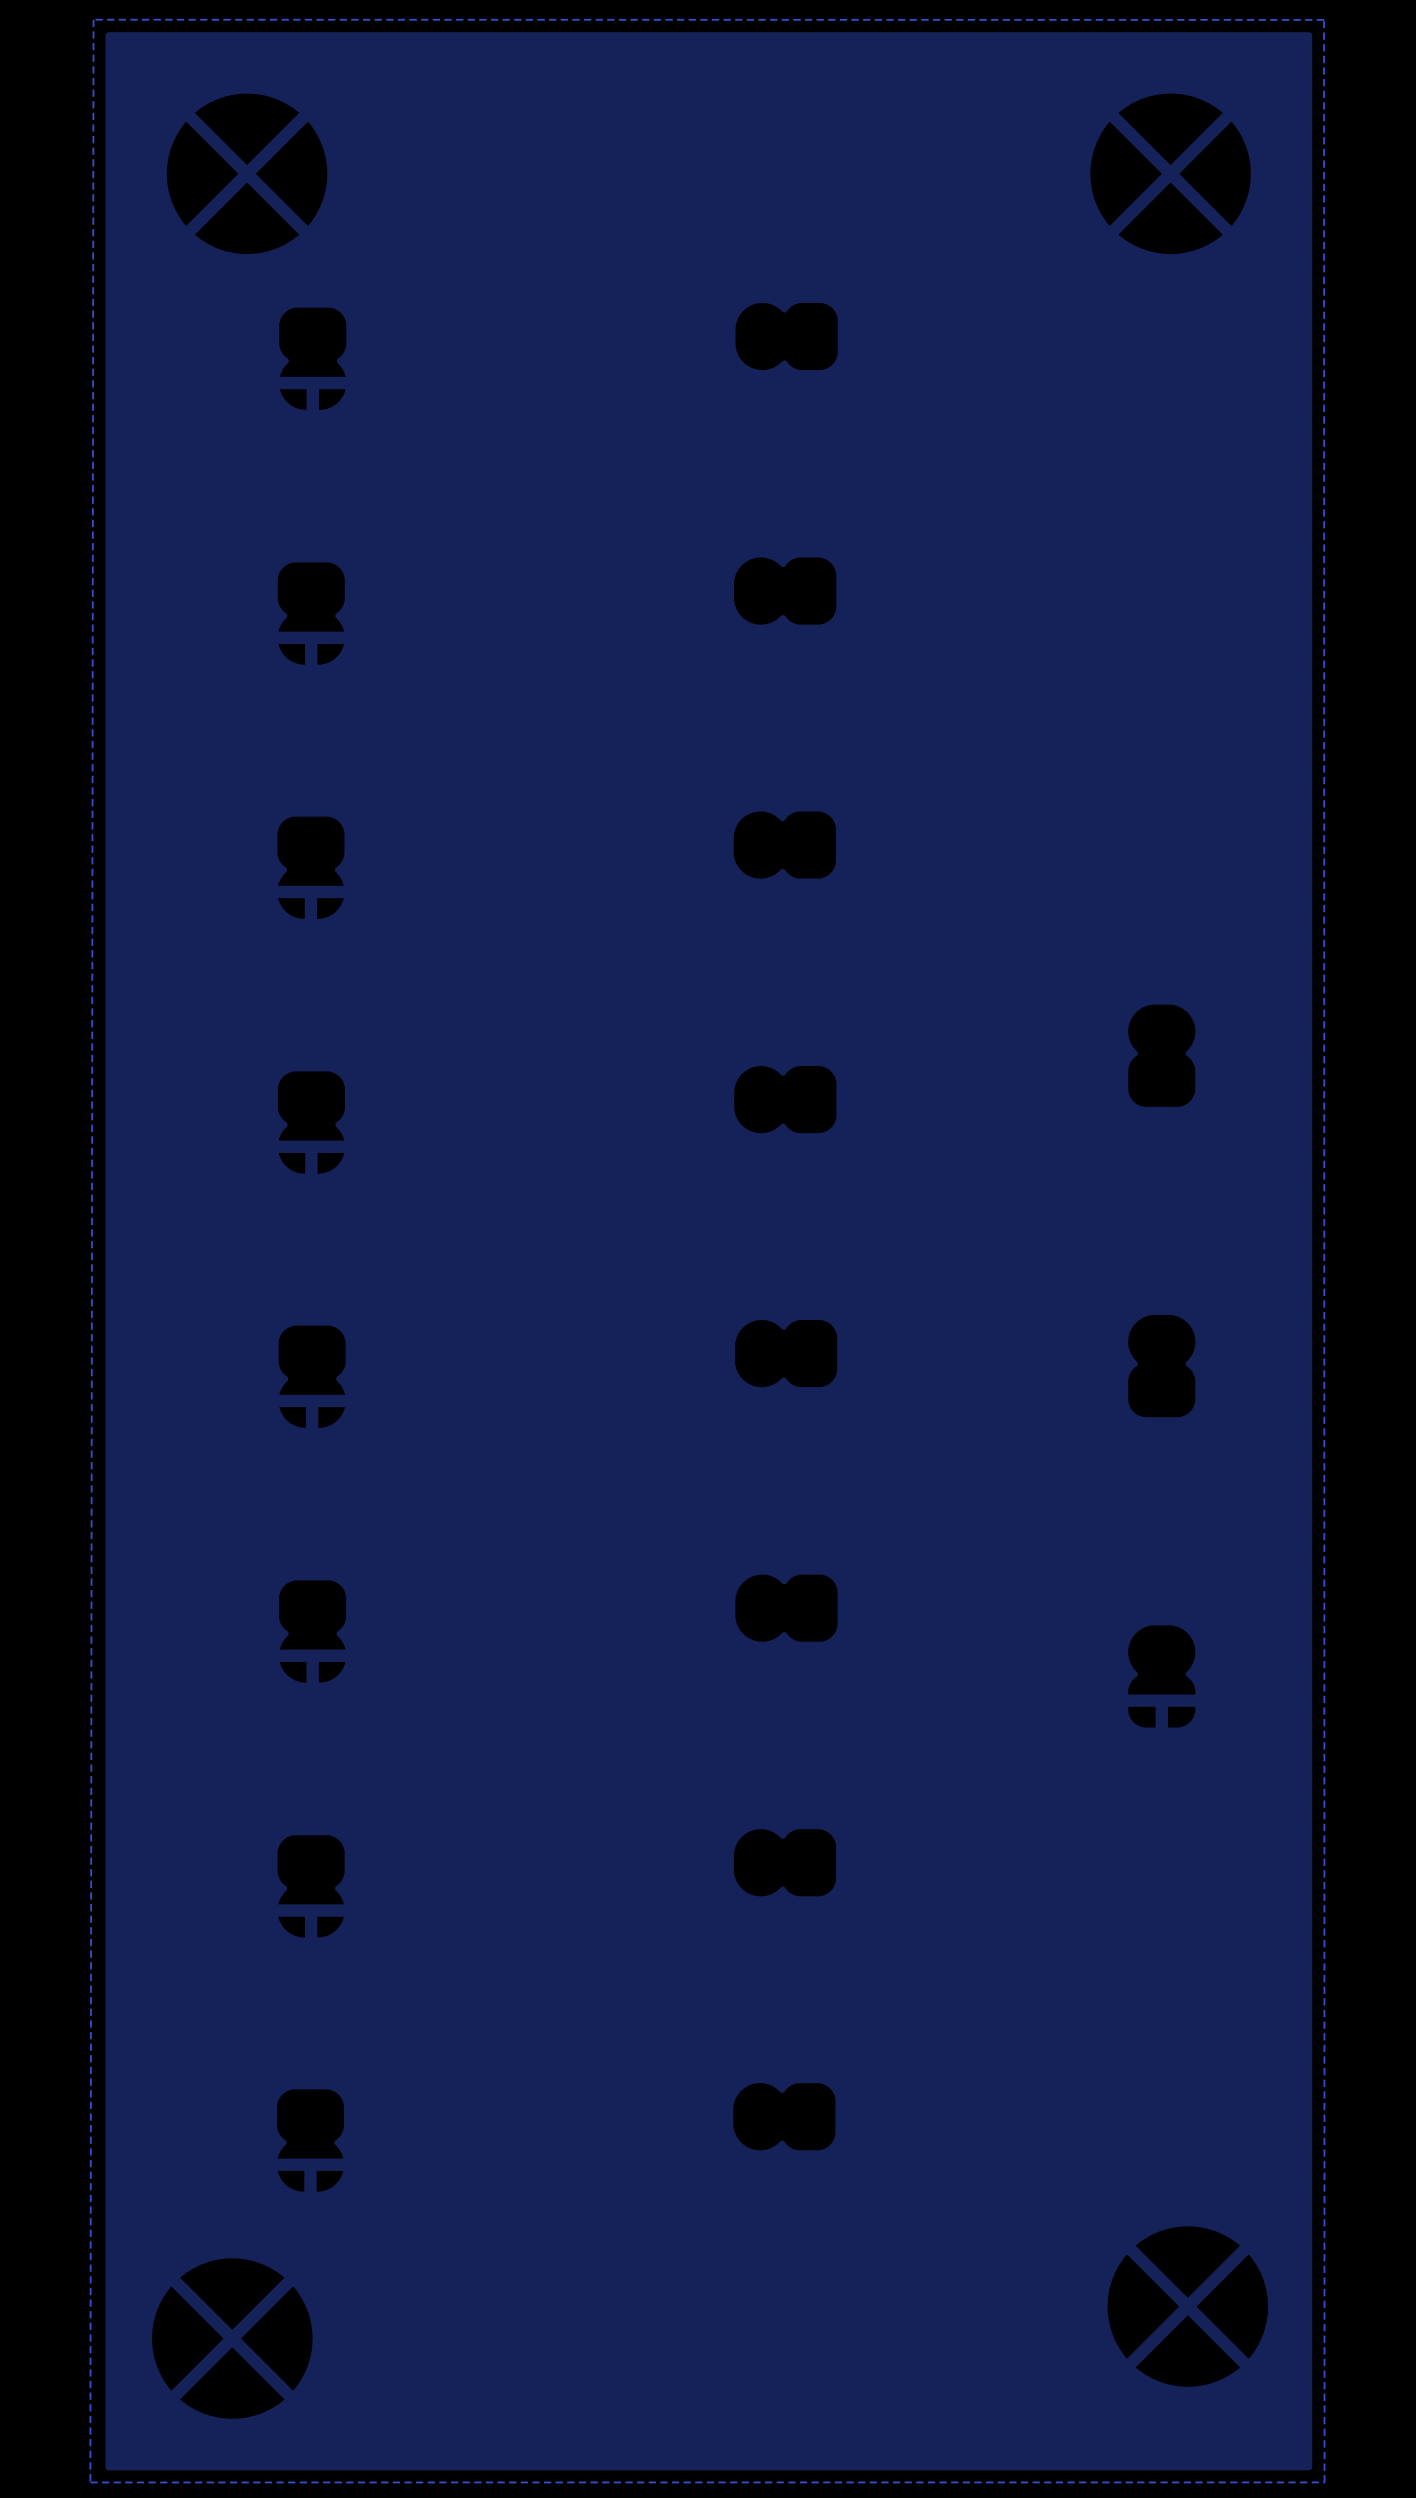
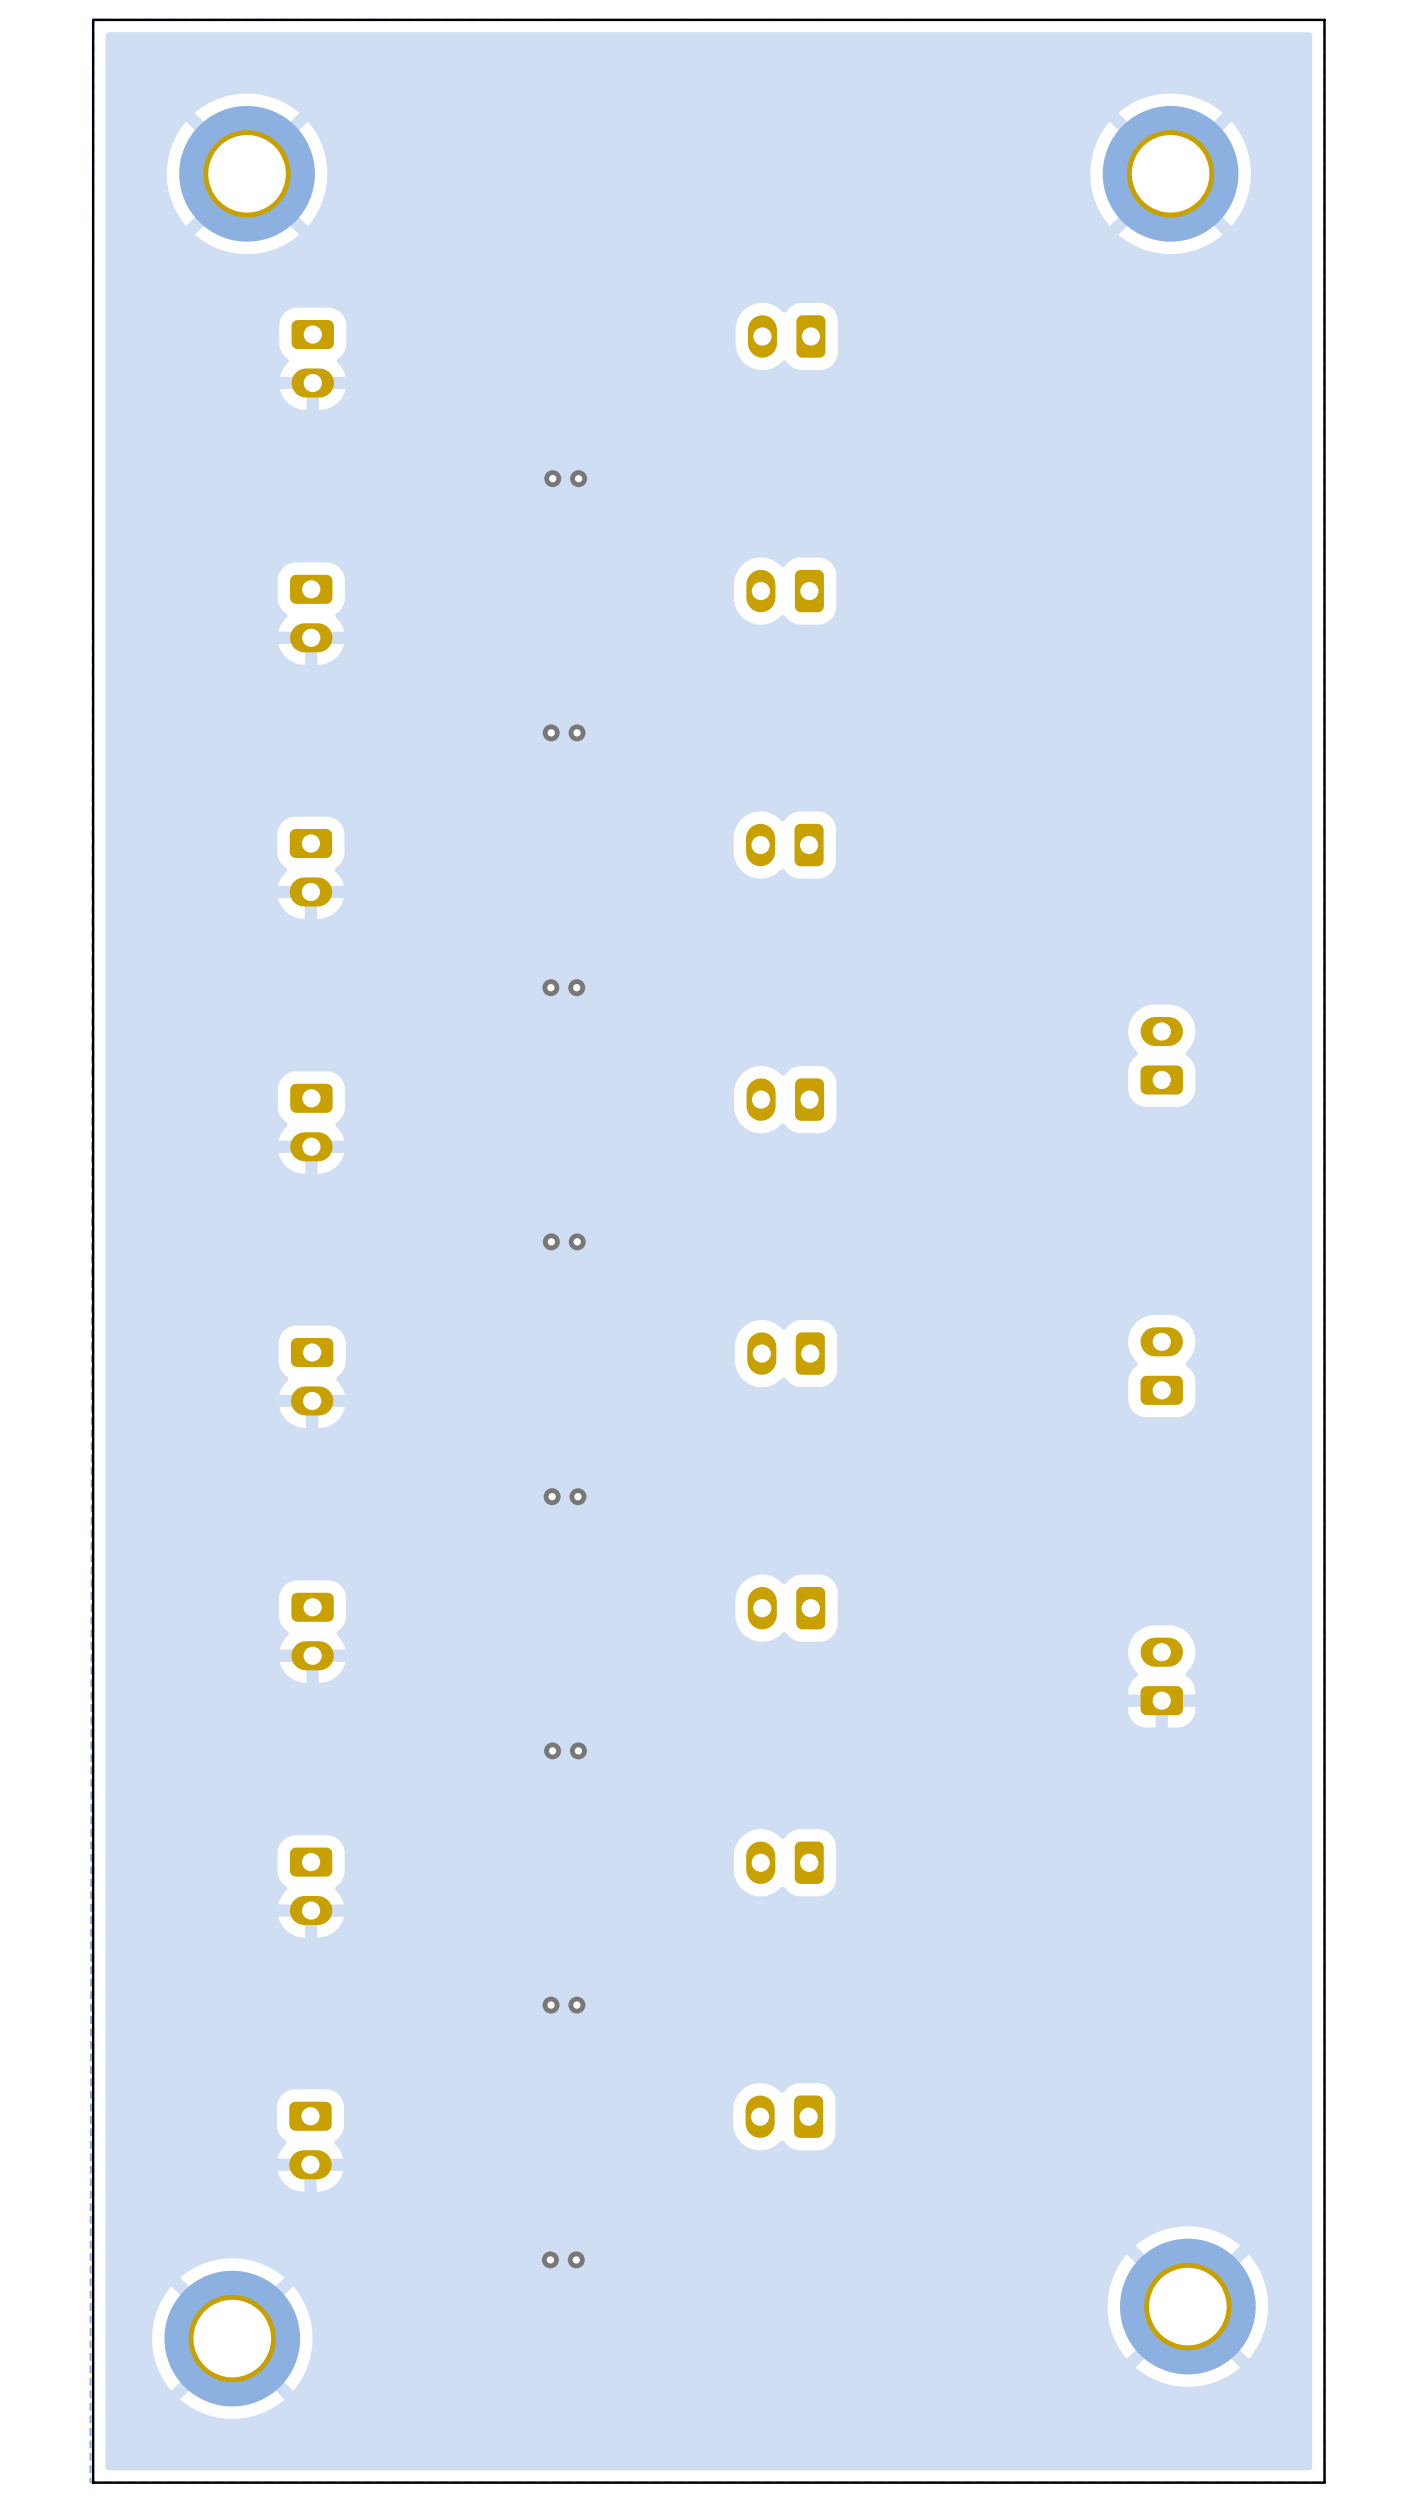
board edge: none -> (1324, 19) (93, 19) (93, 2482) (1324, 2482) (1324, 19)
part: none -> (247, 173)
part: none -> (1170, 173)
part: none -> (786, 336)
part: none -> (312, 358)
via: none -> (552, 478)
via: none -> (578, 478)
part: none -> (785, 591)
part: none -> (311, 613)
via: none -> (551, 732)
via: none -> (577, 732)
part: none -> (784, 845)
part: none -> (310, 867)
via: none -> (550, 987)
via: none -> (576, 987)
part: none -> (1161, 1055)
part: none -> (785, 1099)
part: none -> (311, 1122)
via: none -> (551, 1241)
via: none -> (577, 1241)
part: none -> (786, 1353)
part: none -> (1161, 1366)
part: none -> (312, 1376)
via: none -> (552, 1496)
via: none -> (577, 1496)
part: none -> (786, 1608)
part: none -> (312, 1631)
part: none -> (1161, 1676)
via: none -> (552, 1750)
via: none -> (578, 1750)
part: none -> (784, 1862)
part: none -> (311, 1886)
via: none -> (551, 2005)
via: none -> (576, 2005)
part: none -> (784, 2116)
part: none -> (310, 2140)
via: none -> (550, 2259)
via: none -> (576, 2259)
part: none -> (1187, 2306)
part: none -> (232, 2338)

